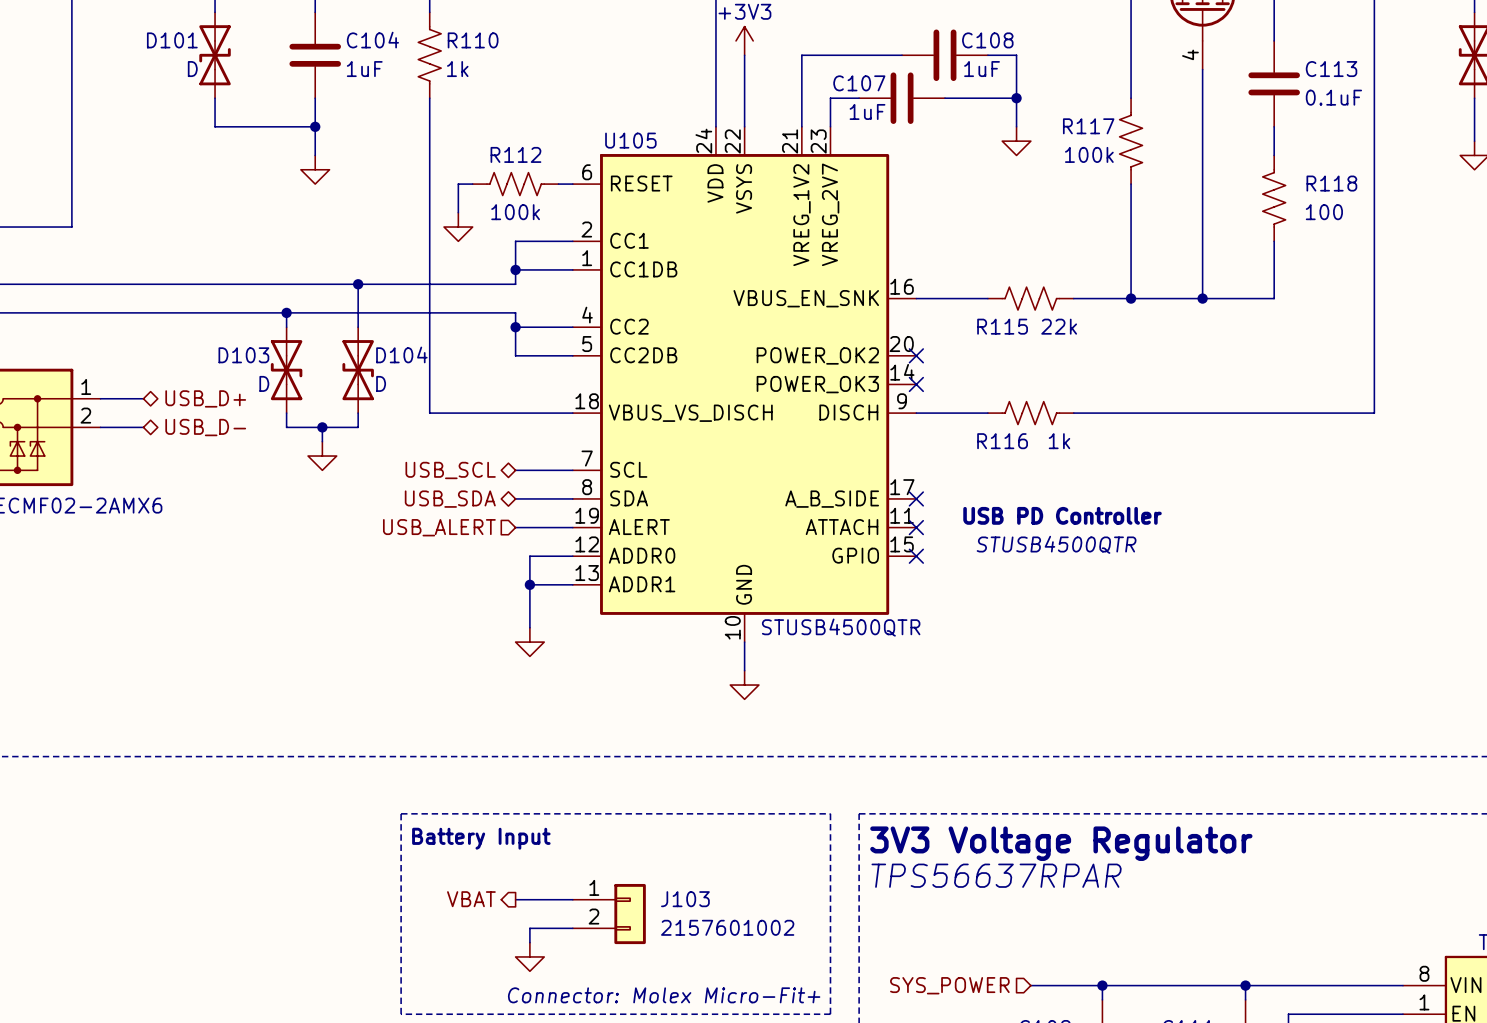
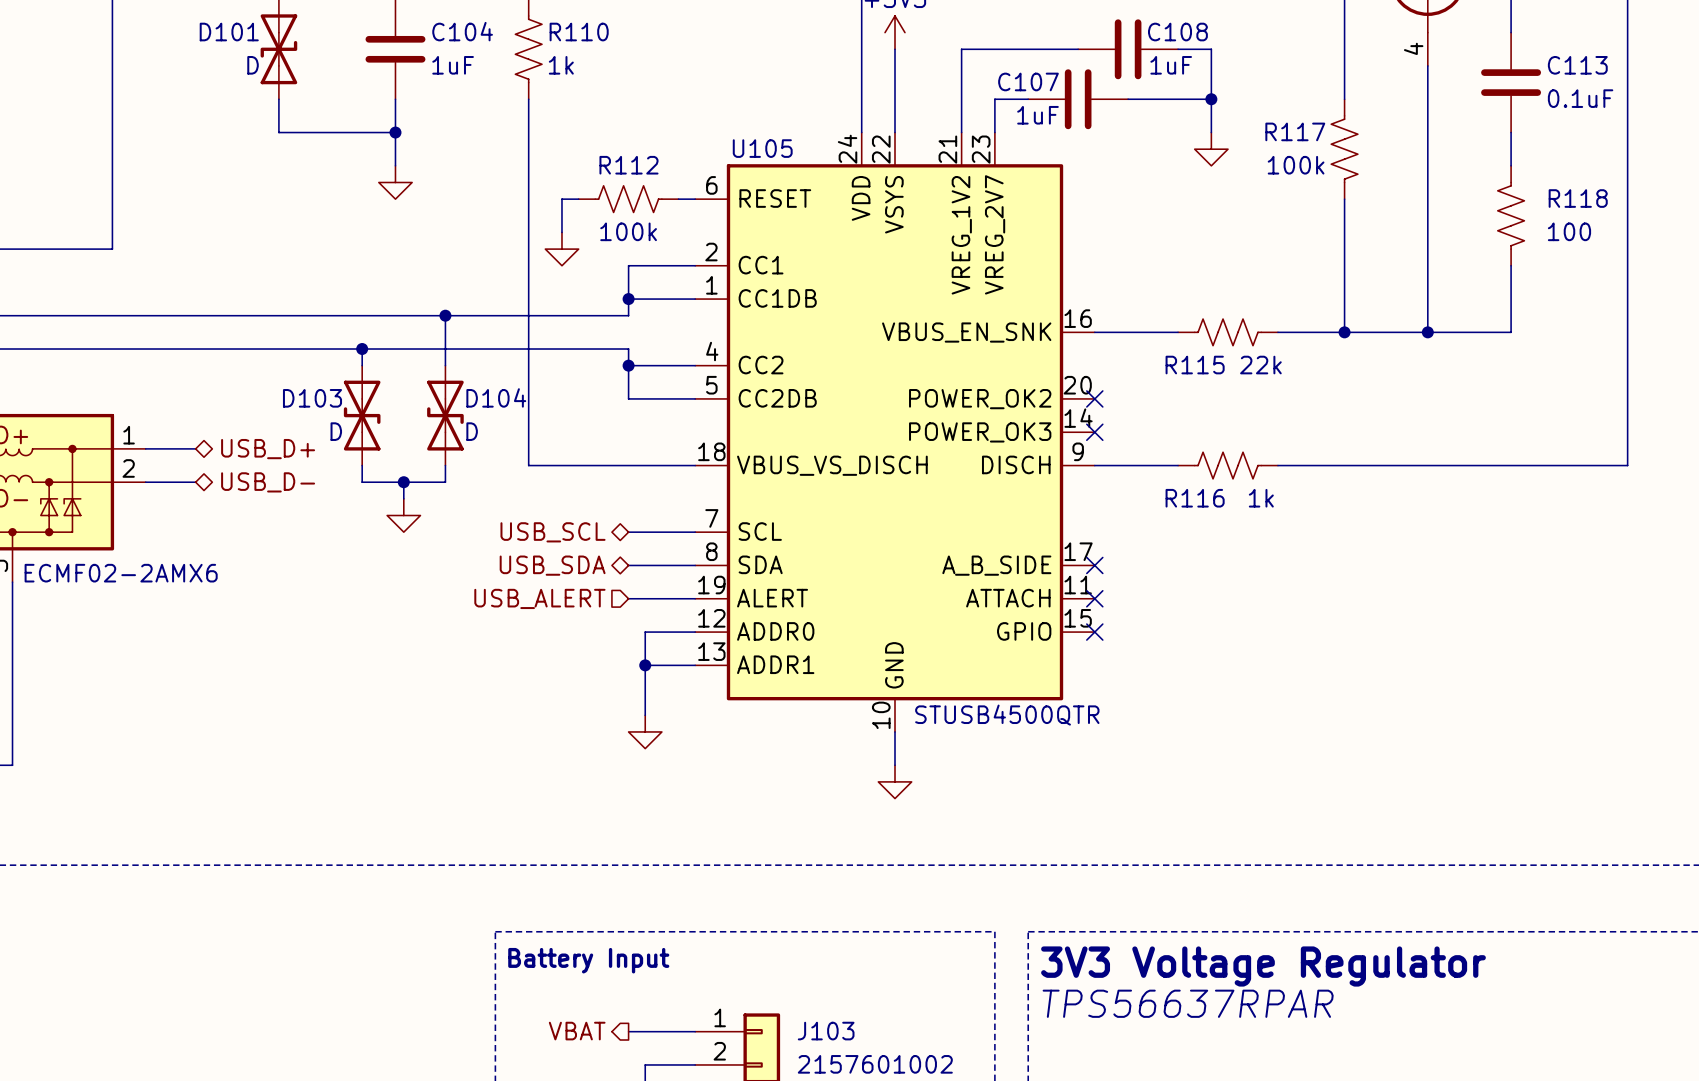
text: USB PD Controller (1062, 515) -> none
text: STUSB4500QTR (1056, 544) -> none

